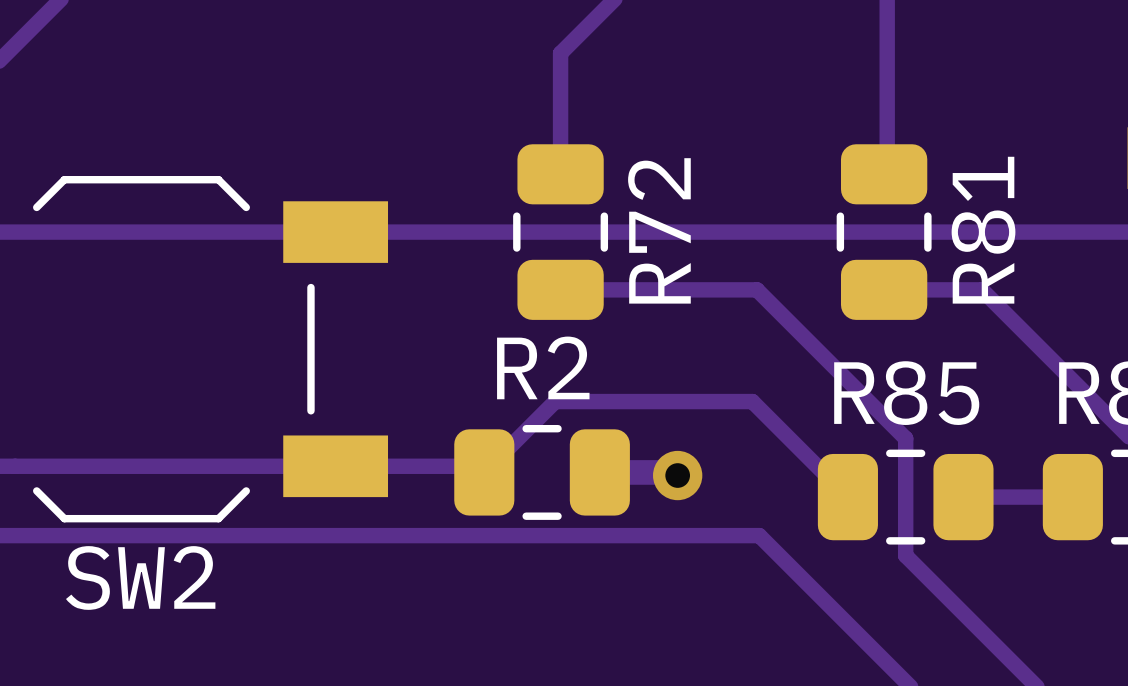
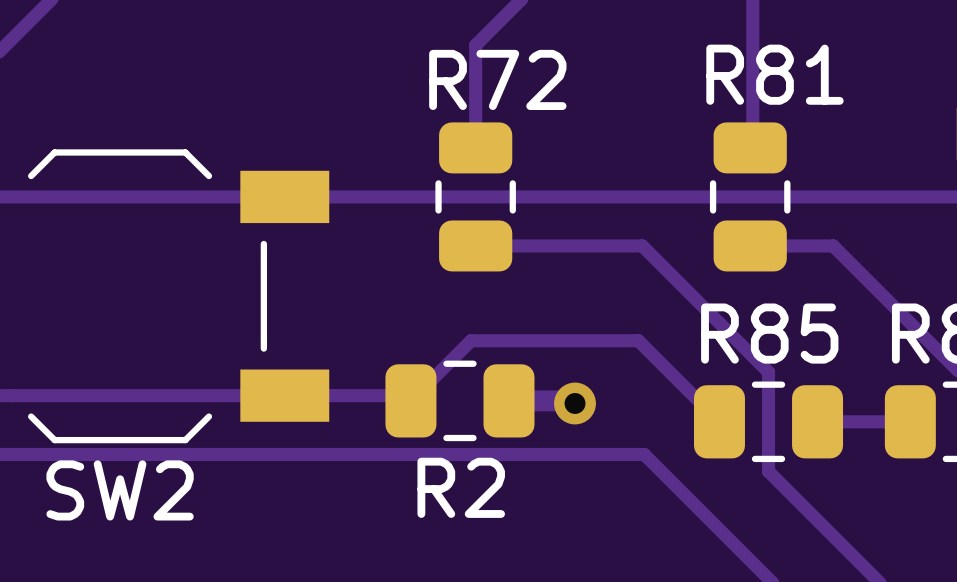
R72 name rotation: 0° (659, 230) -> 90° clockwise (497, 79)
R81 name rotation: 0° (983, 230) -> 90° clockwise (774, 74)
R2 name position: R2 (543, 367) -> R2 (461, 487)

